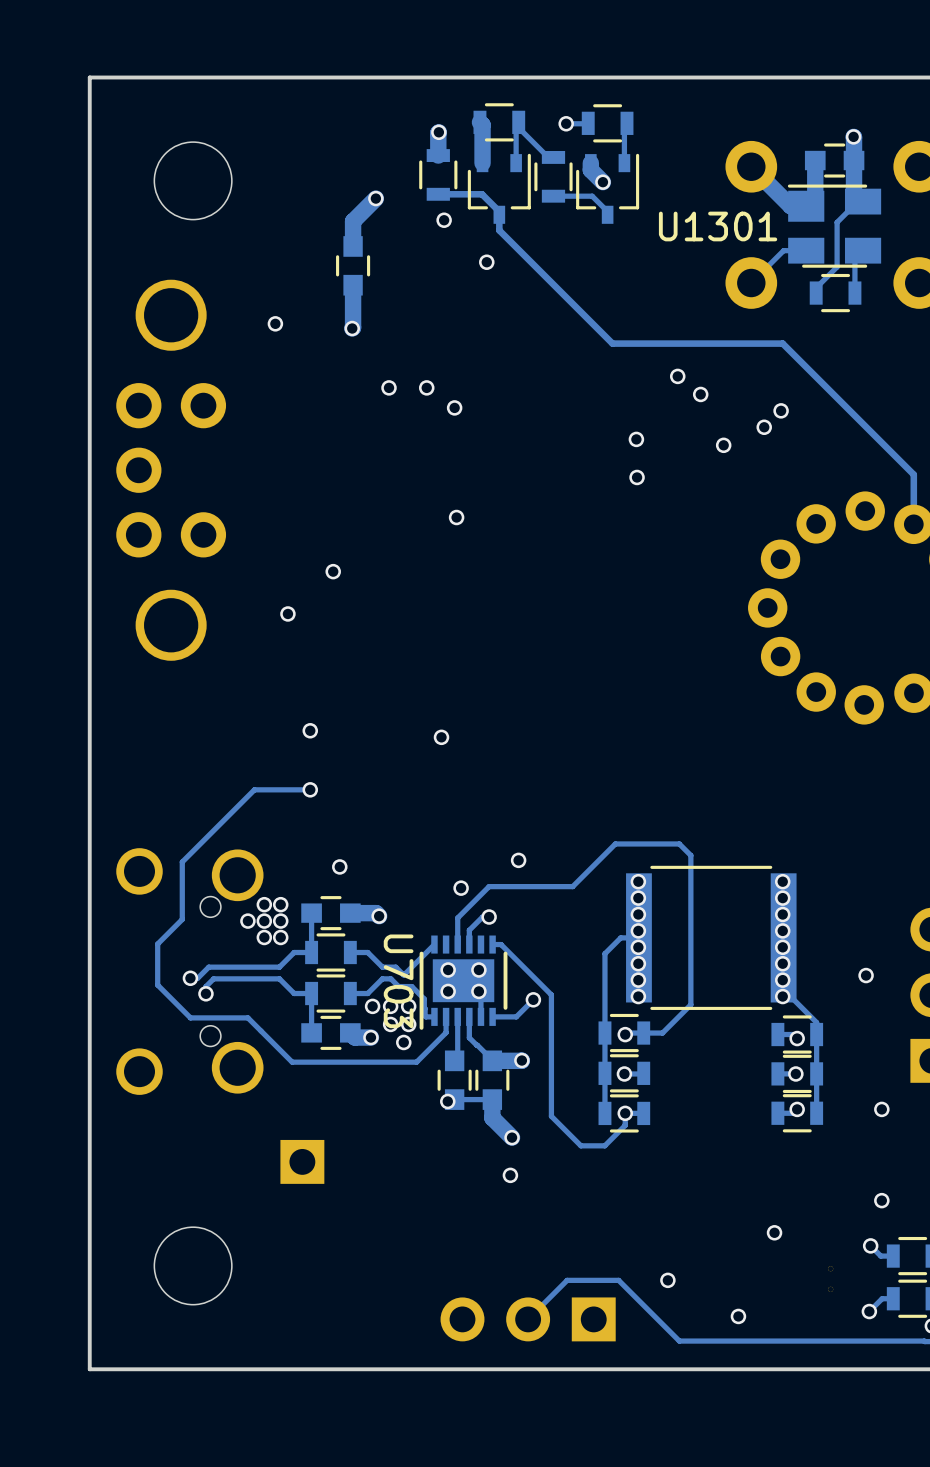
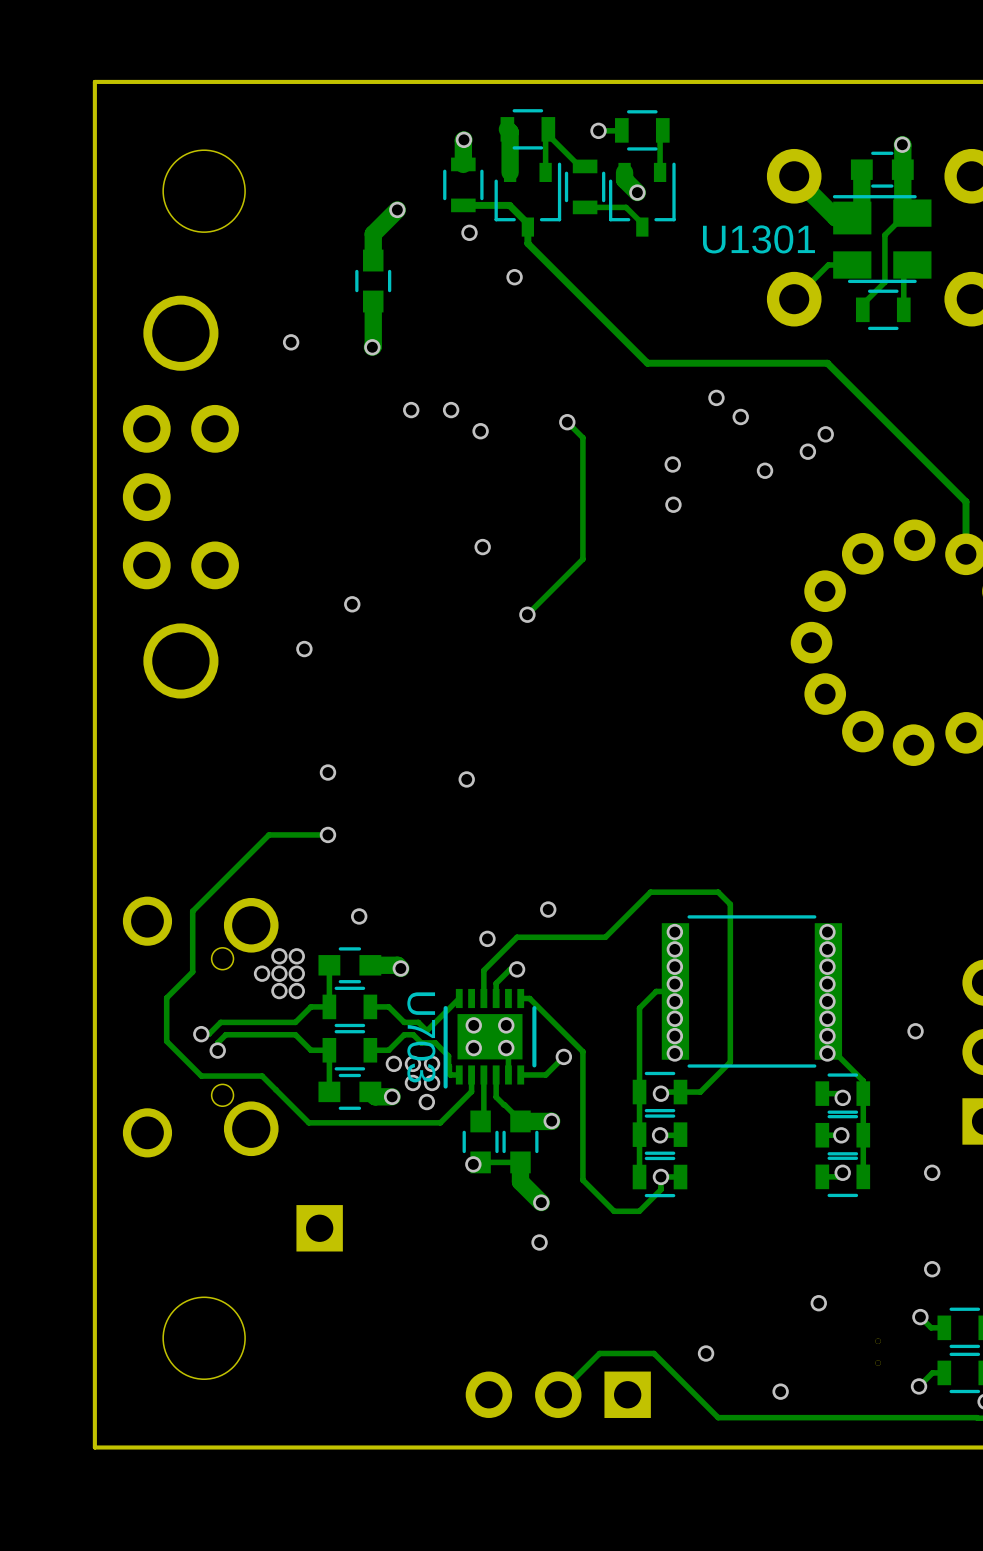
track: none -> (567, 422) (582, 437) (582, 559) (527, 614)
via: none -> (567, 422)
via: none -> (527, 614)

